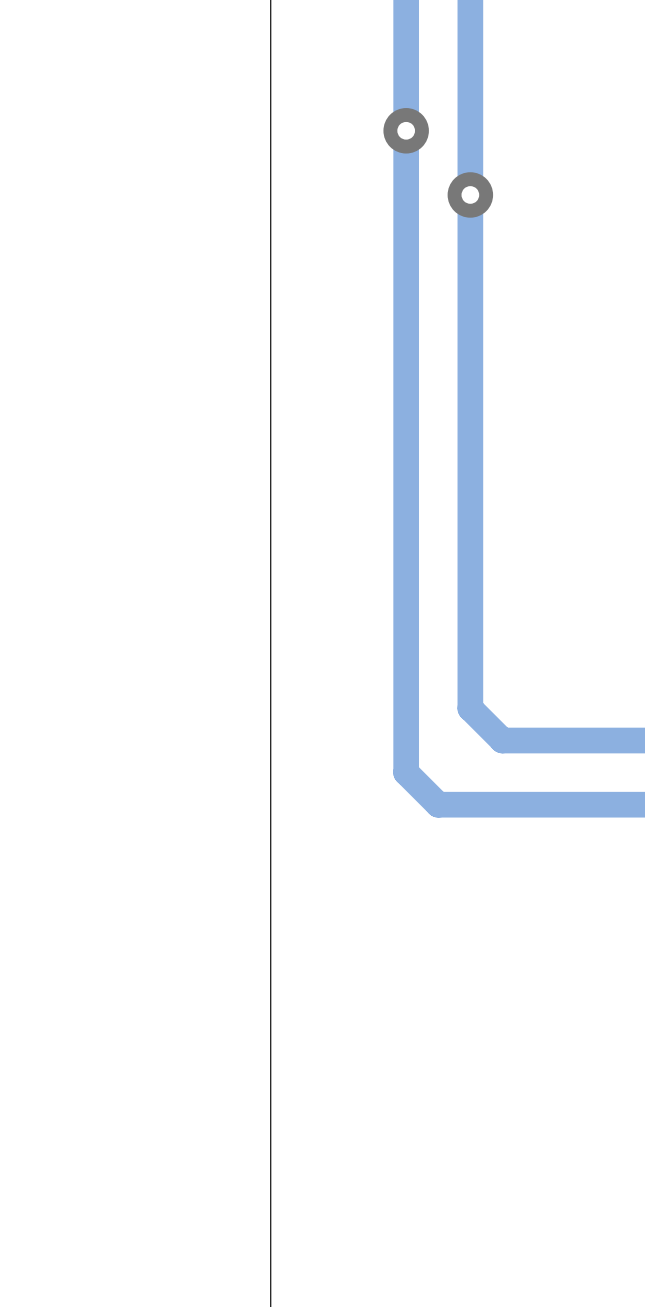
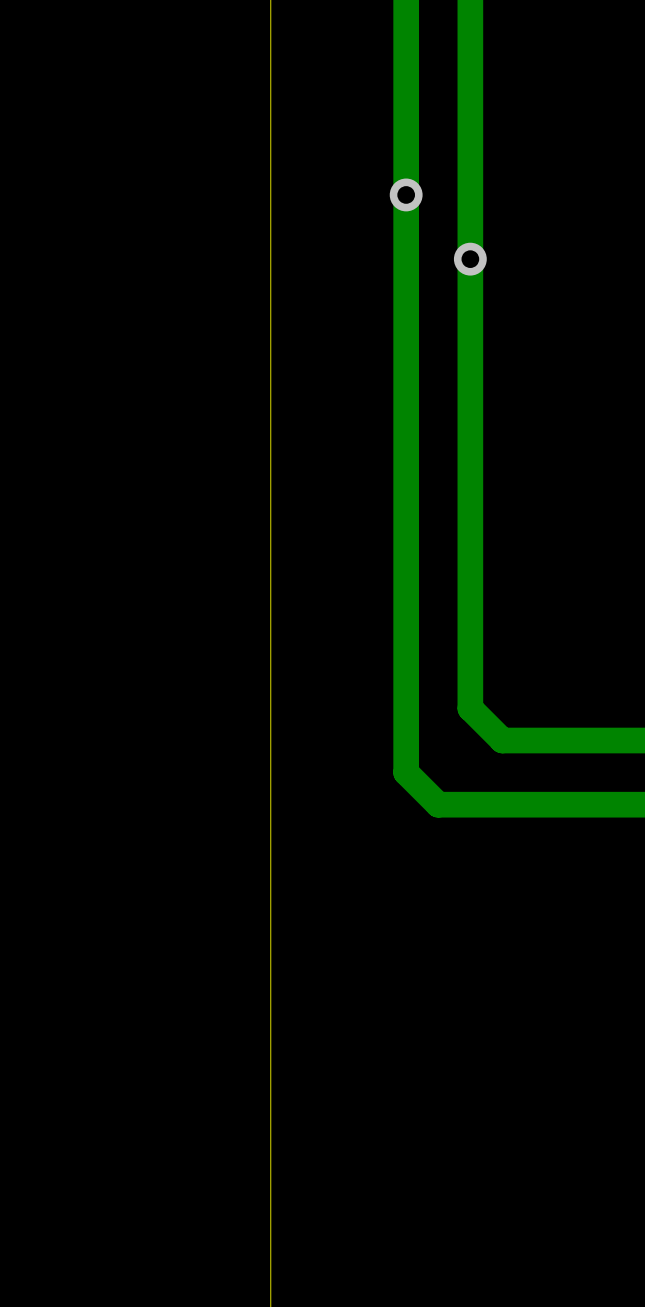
via: (406, 130) -> none
via: none -> (406, 194)
via: (470, 194) -> none
via: none -> (470, 259)

